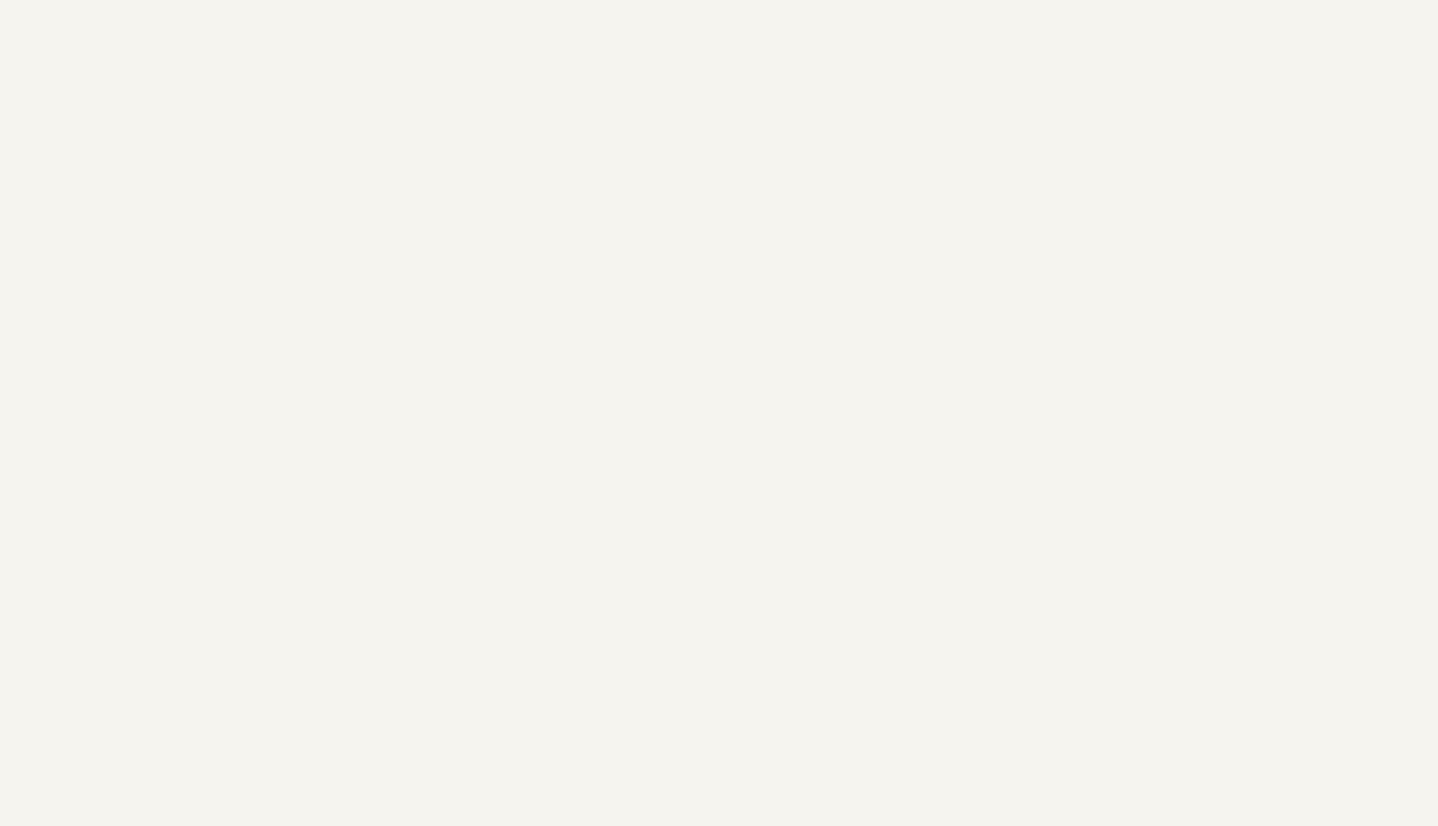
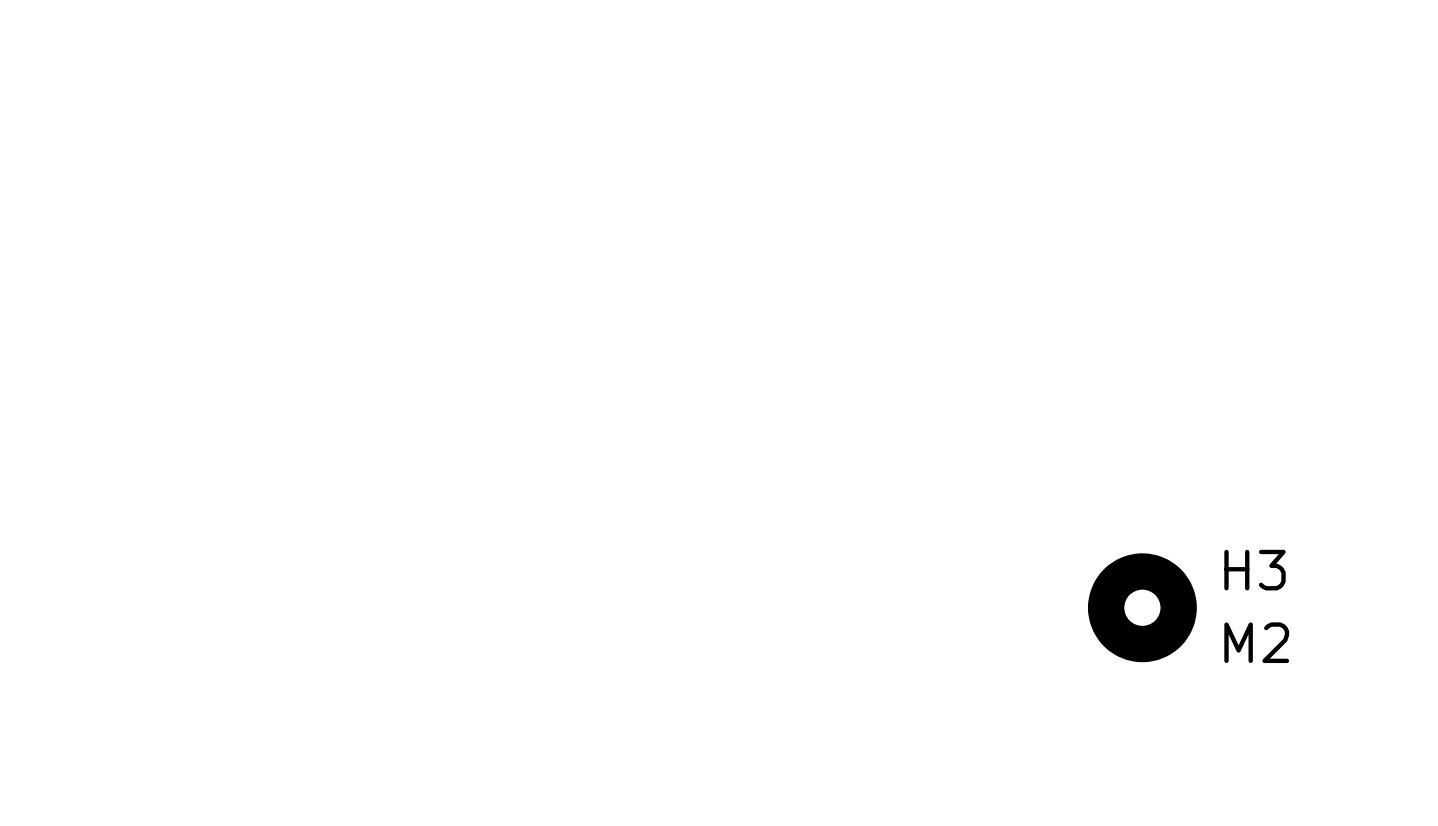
H3: none -> M2 (1142, 607)

